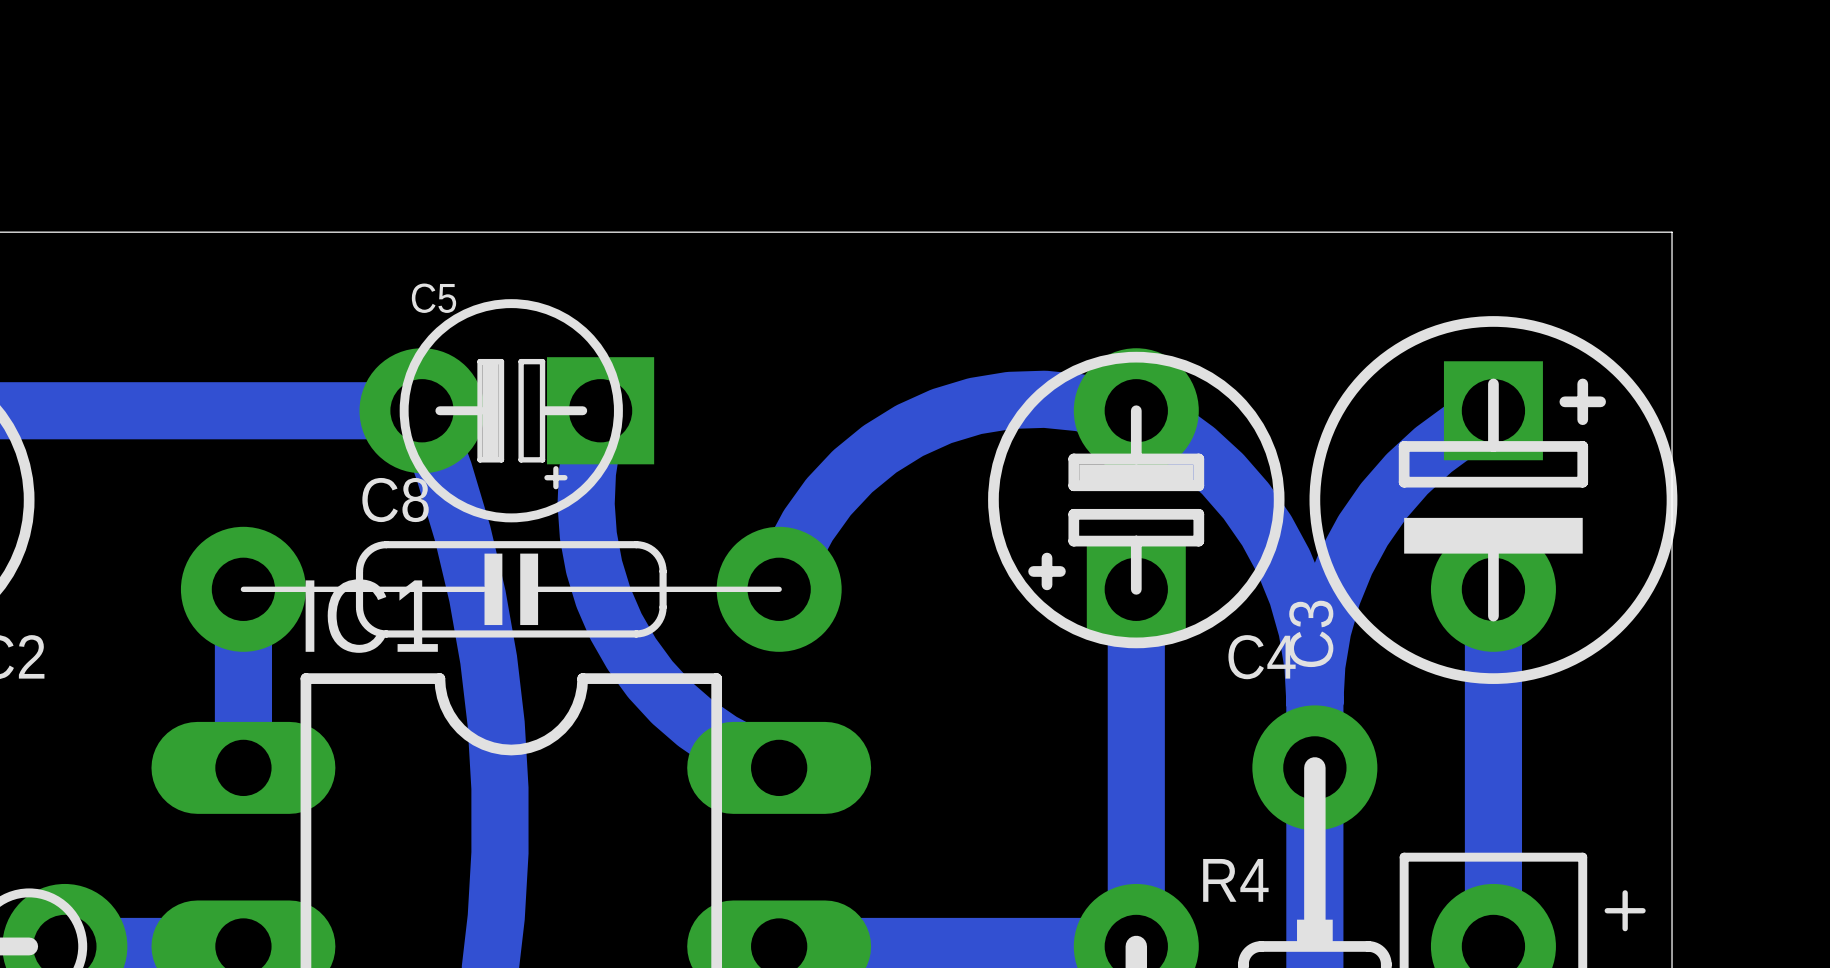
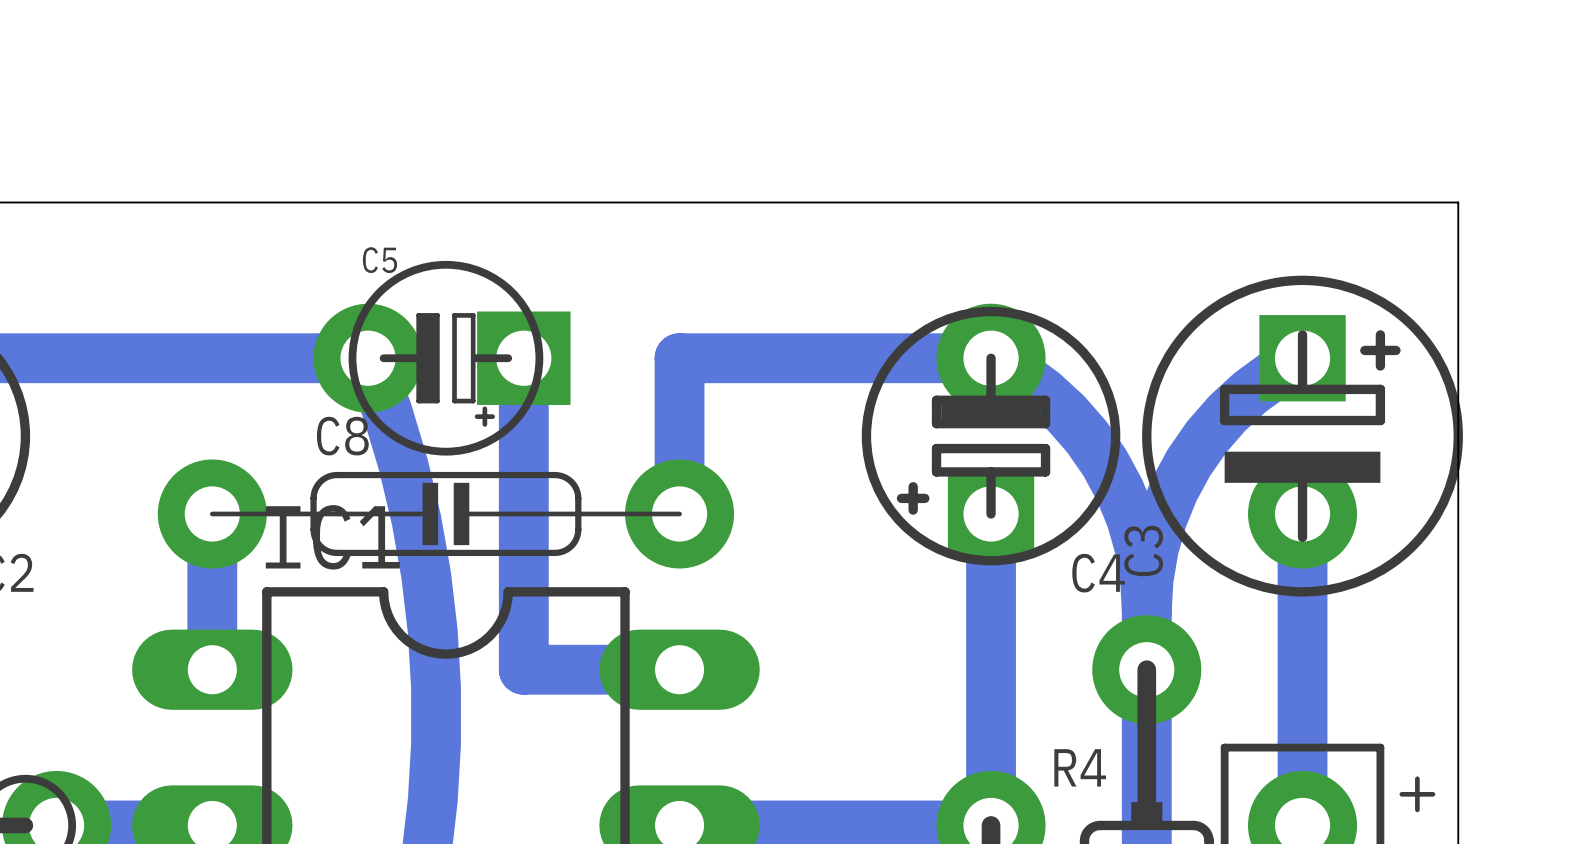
bottom track: (600, 410) (592, 441) (587, 472) (586, 504) (588, 535) (594, 566) (603, 597) (615, 626) (631, 653) (650, 679) (671, 702) (695, 723) (721, 741) (749, 756) (779, 767) -> (523, 358) (523, 669) (679, 669)
bottom track: (1113, 410) (1079, 402) (1044, 399) (1009, 400) (975, 406) (941, 416) (909, 430) (879, 449) (852, 471) (828, 497) (808, 525) (791, 556) (779, 589) -> (971, 358) (679, 358) (679, 513)

